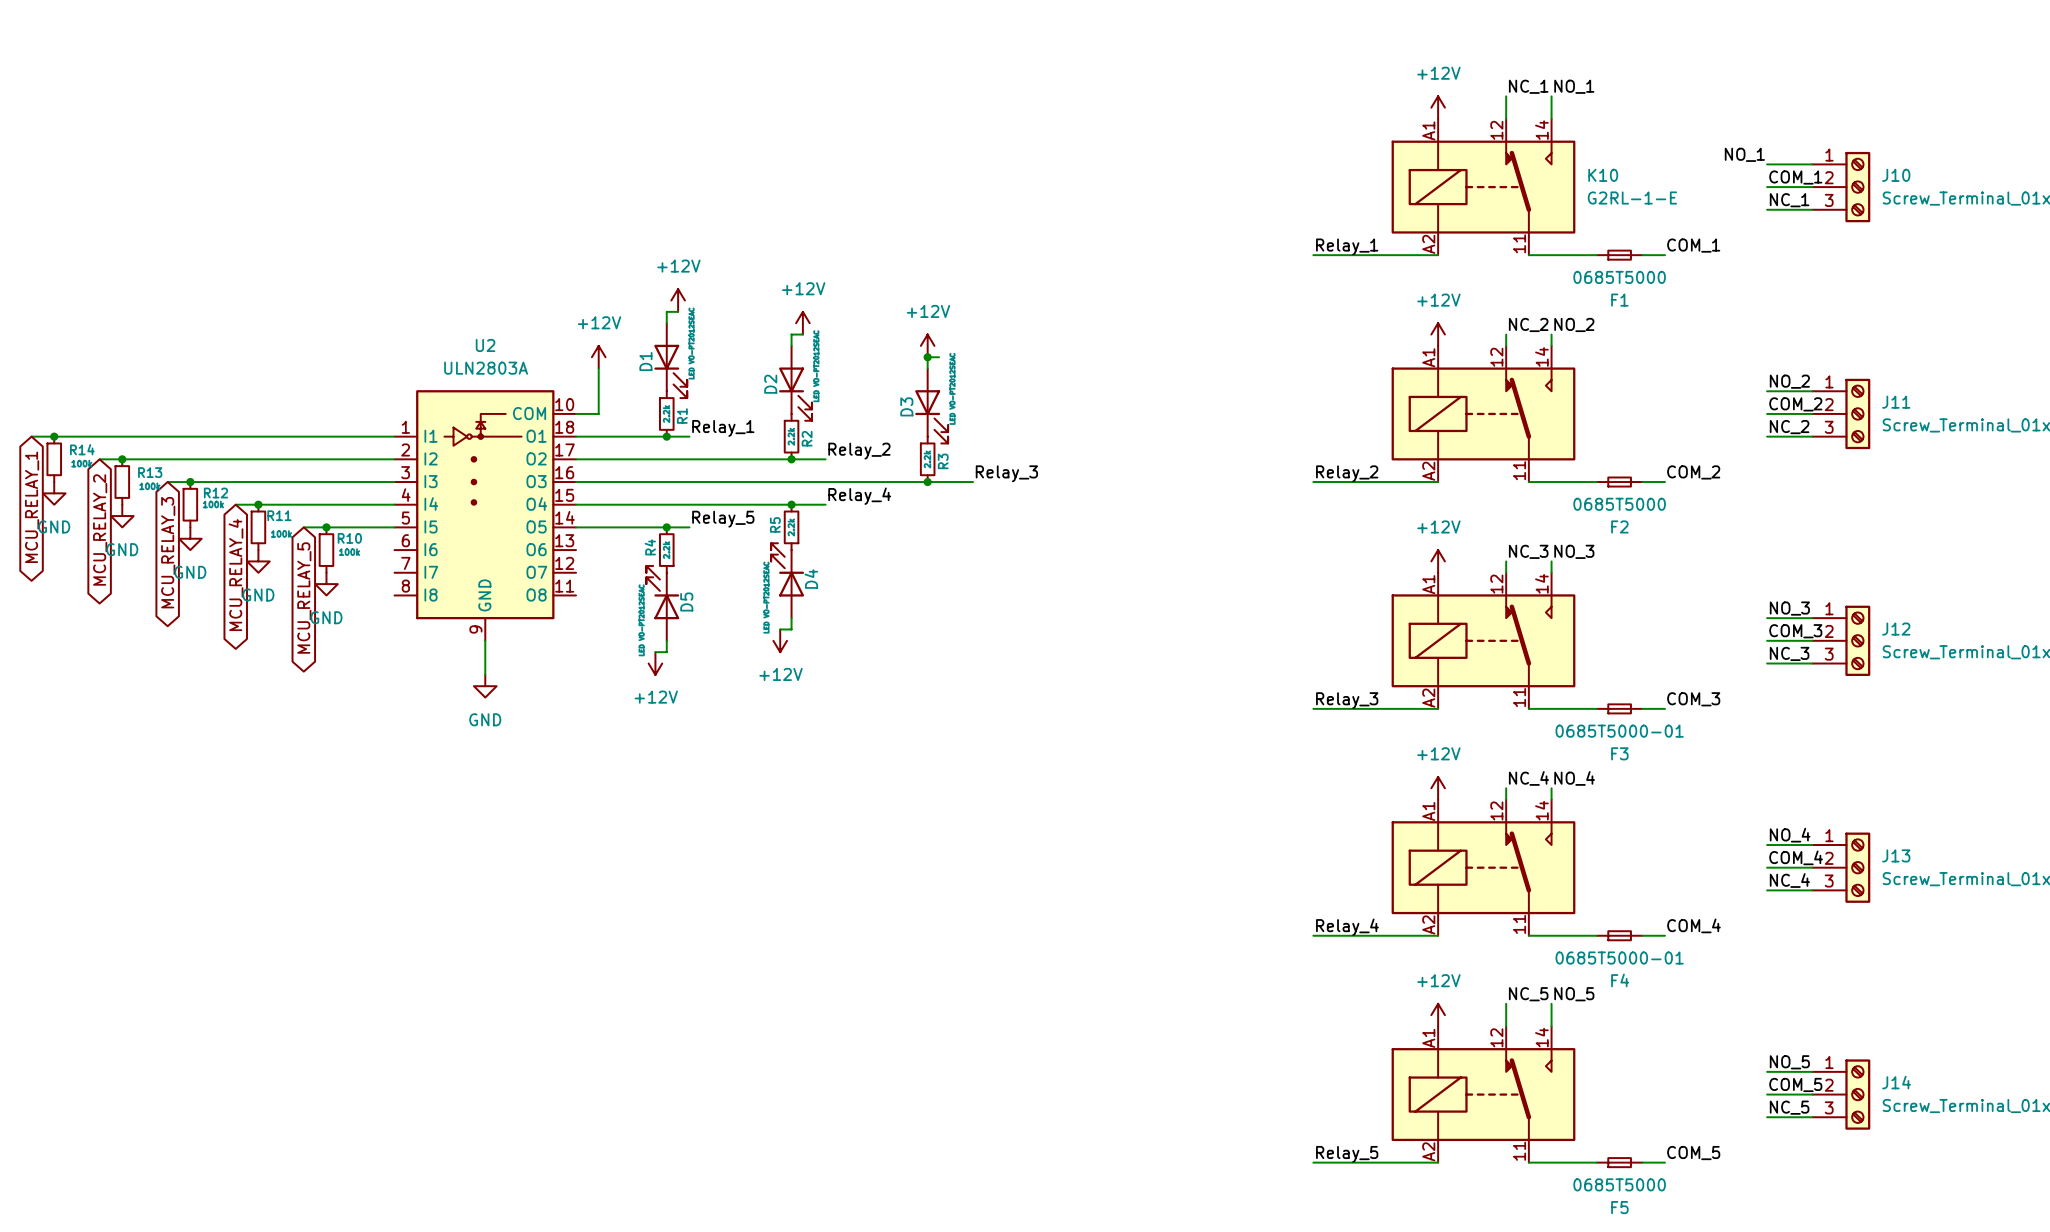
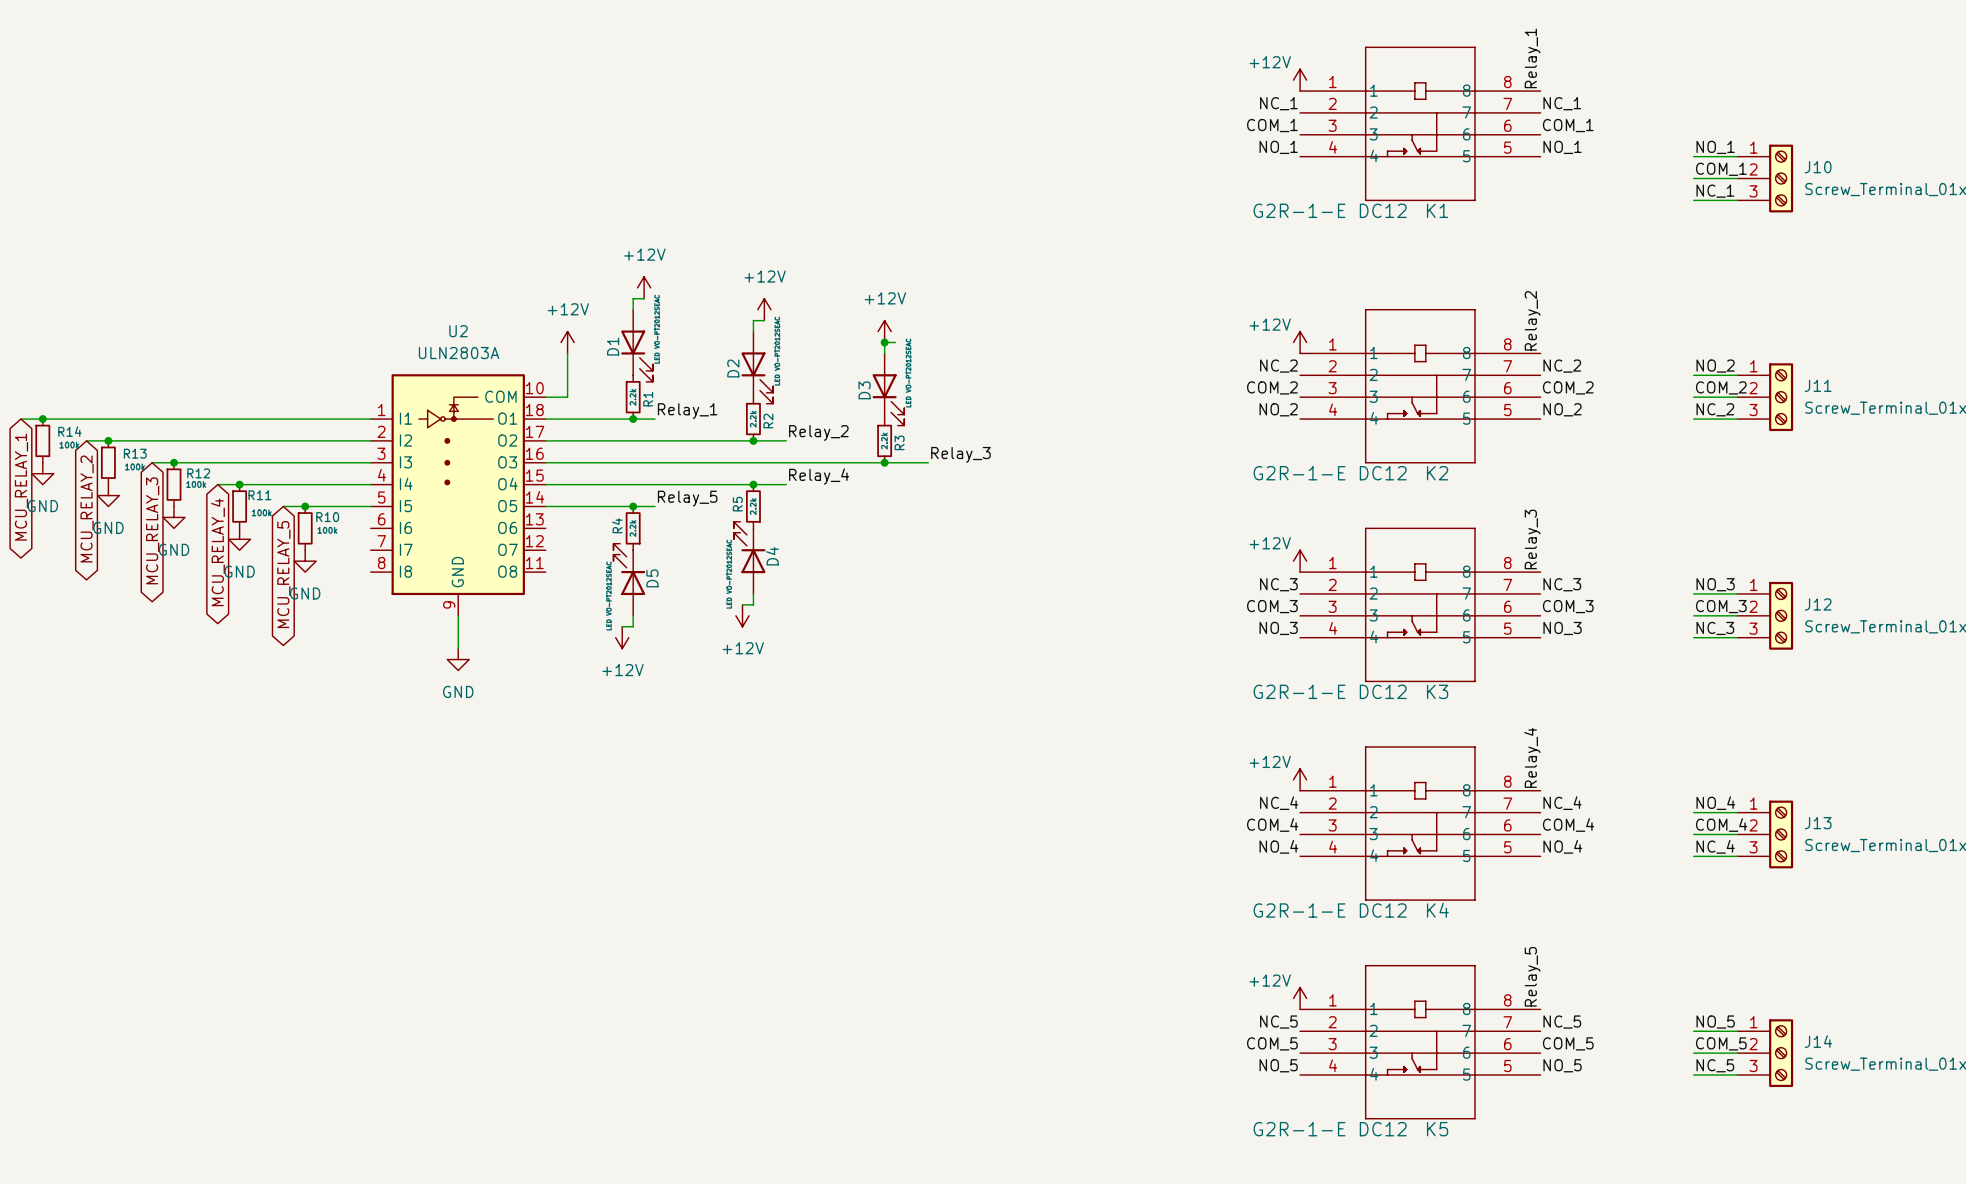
label: none -> Relay_1 (1532, 58)
power symbol text position: +12V (1438, 73) -> +12V (1270, 62)
label: NC_1 (1528, 86) -> none
label position: NO_1 (1574, 86) -> NO_1 (1562, 147)
wire: (1506, 96) (1506, 119) -> none
wire: (1551, 96) (1551, 119) -> none
power symbol position: +12V (1438, 107) -> +12V (1300, 80)
label: none -> NC_1 (1278, 103)
label: none -> NC_1 (1562, 103)
K1: none -> G2R-1-E DC12 (1420, 123)
label: none -> COM_1 (1272, 125)
label: none -> NO_1 (1278, 147)
label position: NO_1 (1744, 154) -> NO_1 (1715, 147)
K10: G2RL-1-E (1483, 187) -> none
label position: COM_1 (1693, 245) -> COM_1 (1568, 125)
label: Relay_1 (1347, 246) -> none
wire: (1313, 255) (1438, 255) -> none
wire: (1528, 255) (1596, 255) -> none
F1: 0685T5000 (1619, 255) -> none
wire: (1642, 255) (1664, 255) -> none
power symbol text position: +12V (1438, 300) -> +12V (1270, 324)
label: NC_2 (1528, 324) -> none
label: NO_2 (1574, 324) -> none
power symbol position: +12V (1438, 334) -> +12V (1300, 342)
wire: (1506, 334) (1506, 345) -> none
wire: (1551, 334) (1551, 345) -> none
label: none -> Relay_2 (1532, 320)
label: none -> NC_2 (1278, 366)
label: none -> NC_2 (1562, 366)
K2: none -> G2R-1-E DC12 (1420, 386)
label: none -> COM_2 (1272, 387)
part: (1483, 413) -> none
label: none -> NO_2 (1278, 409)
label: none -> NO_2 (1562, 409)
label position: COM_2 (1693, 472) -> COM_2 (1568, 387)
label: Relay_2 (1347, 473) -> none
wire: (1313, 482) (1438, 482) -> none
wire: (1528, 482) (1596, 482) -> none
F2: 0685T5000 (1619, 482) -> none
wire: (1642, 482) (1664, 482) -> none
power symbol text position: +12V (1438, 526) -> +12V (1270, 543)
label: NC_3 (1528, 551) -> none
label: NO_3 (1574, 551) -> none
power symbol position: +12V (1438, 561) -> +12V (1300, 561)
wire: (1506, 561) (1506, 572) -> none
wire: (1551, 561) (1551, 572) -> none
label: none -> Relay_3 (1532, 539)
label: none -> NC_3 (1278, 584)
label: none -> NC_3 (1562, 584)
K3: none -> G2R-1-E DC12 (1420, 604)
label: none -> COM_3 (1272, 606)
part: (1483, 640) -> none
label: none -> NO_3 (1278, 628)
label: none -> NO_3 (1562, 628)
label position: COM_3 (1693, 699) -> COM_3 (1568, 606)
label: Relay_3 (1347, 700) -> none
wire: (1313, 708) (1438, 708) -> none
wire: (1528, 708) (1596, 708) -> none
F3: 0685T5000-01 (1619, 708) -> none
wire: (1642, 708) (1664, 708) -> none
power symbol text position: +12V (1438, 753) -> +12V (1270, 761)
label: NC_4 (1528, 778) -> none
label: NO_4 (1574, 778) -> none
power symbol position: +12V (1438, 788) -> +12V (1300, 779)
wire: (1506, 788) (1506, 799) -> none
wire: (1551, 788) (1551, 799) -> none
label: none -> Relay_4 (1532, 757)
label: none -> NC_4 (1279, 803)
label: none -> NC_4 (1562, 803)
K4: none -> G2R-1-E DC12 (1420, 823)
label: none -> COM_4 (1272, 824)
part: (1483, 867) -> none
label: none -> NO_4 (1278, 846)
label: none -> NO_4 (1562, 846)
label position: COM_4 (1693, 925) -> COM_4 (1568, 824)
label: Relay_4 (1347, 927) -> none
wire: (1313, 935) (1438, 935) -> none
wire: (1528, 935) (1596, 935) -> none
F4: 0685T5000-01 (1619, 935) -> none
wire: (1642, 935) (1664, 935) -> none
power symbol text position: +12V (1438, 980) -> +12V (1270, 980)
label: NC_5 (1528, 994) -> none
label: NO_5 (1574, 994) -> none
wire: (1506, 1003) (1506, 1026) -> none
wire: (1551, 1003) (1551, 1026) -> none
power symbol position: +12V (1438, 1015) -> +12V (1300, 998)
label: none -> Relay_5 (1532, 976)
label: none -> NC_5 (1278, 1022)
label: none -> NC_5 (1562, 1022)
K5: none -> G2R-1-E DC12 (1420, 1042)
label: none -> COM_5 (1272, 1043)
part: (1483, 1094) -> none
label: none -> NO_5 (1278, 1065)
label: none -> NO_5 (1562, 1065)
label position: COM_5 (1693, 1153) -> COM_5 (1568, 1043)
label: Relay_5 (1347, 1154) -> none
wire: (1313, 1162) (1438, 1162) -> none
wire: (1528, 1162) (1596, 1162) -> none
F5: 0685T5000 (1619, 1162) -> none
wire: (1642, 1162) (1664, 1162) -> none

